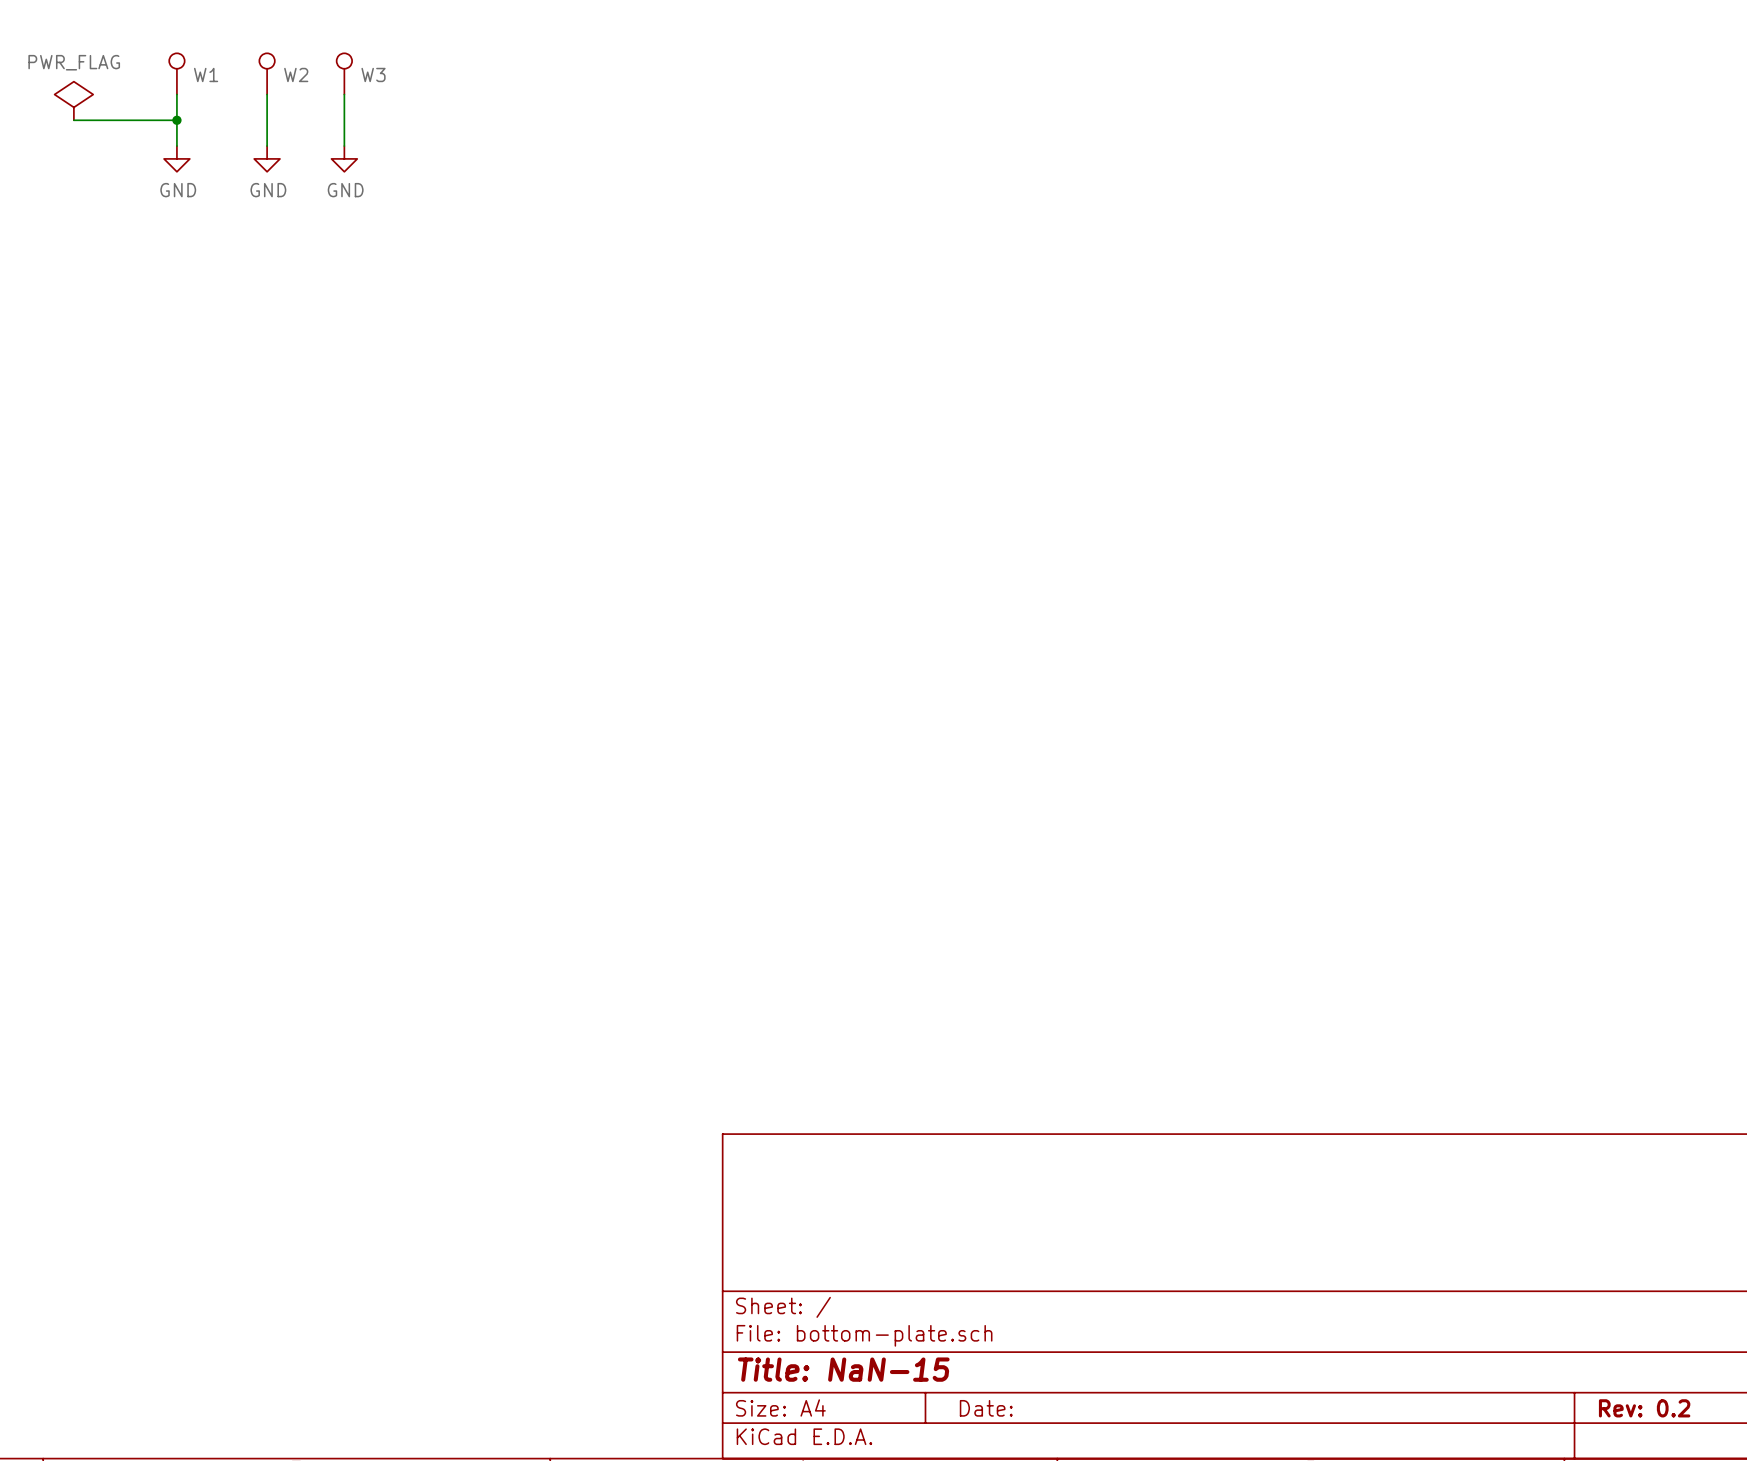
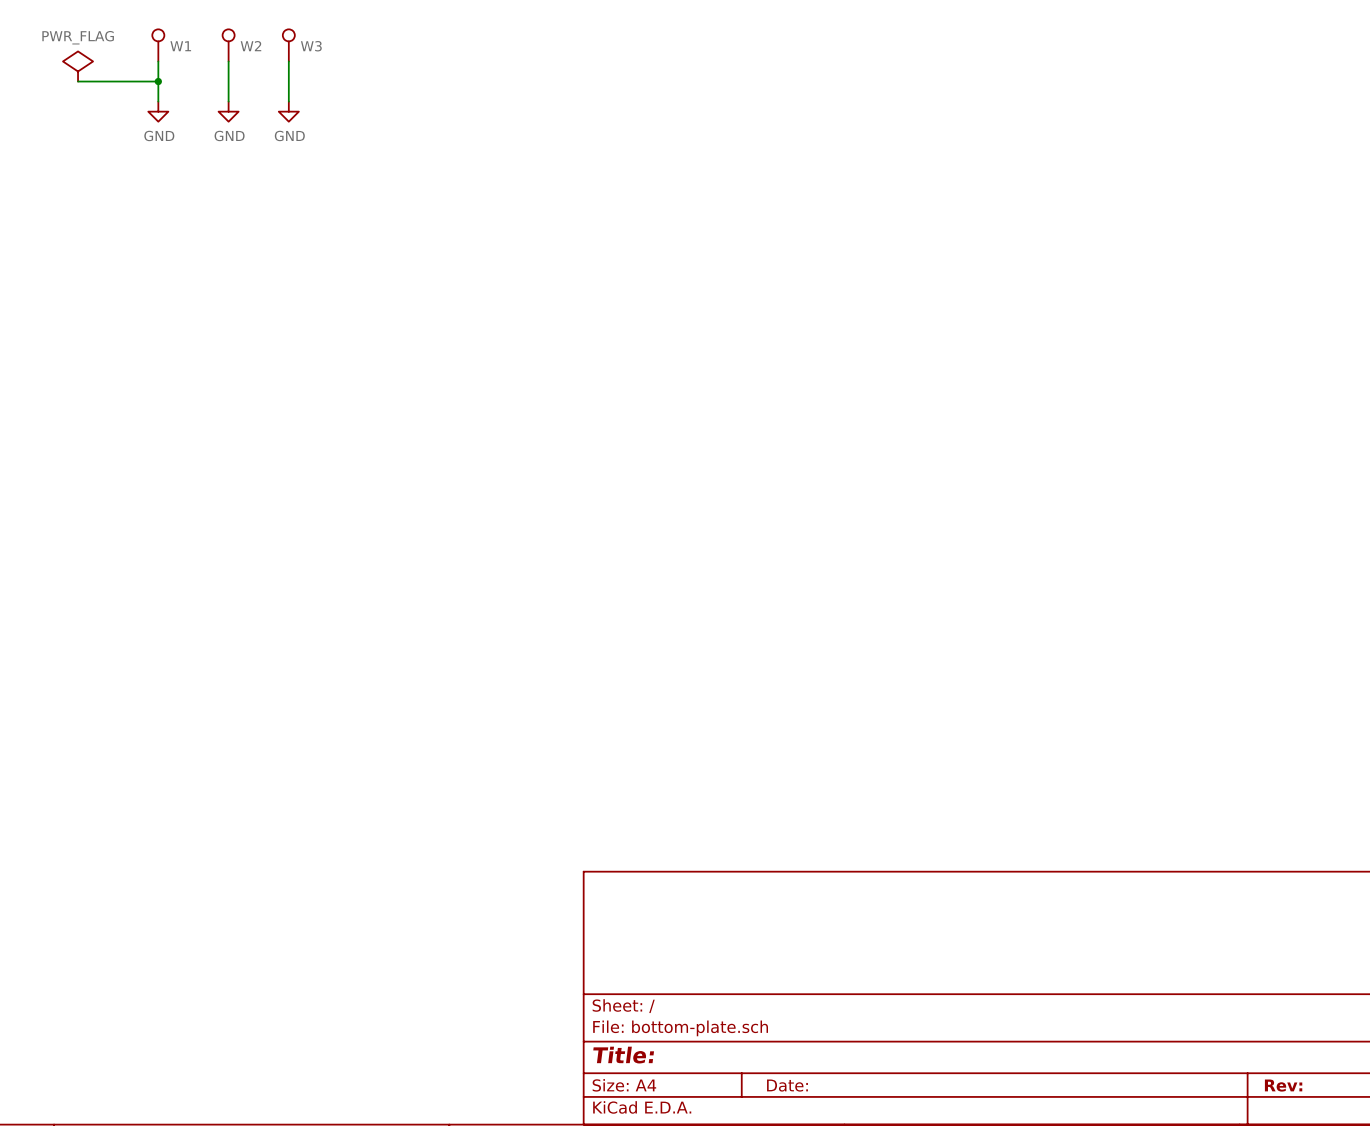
title block: Title: NaN-15 (843, 1369) -> Title: (623, 1055)
title block: Rev: 0.2 (1644, 1408) -> Rev: (1283, 1085)

